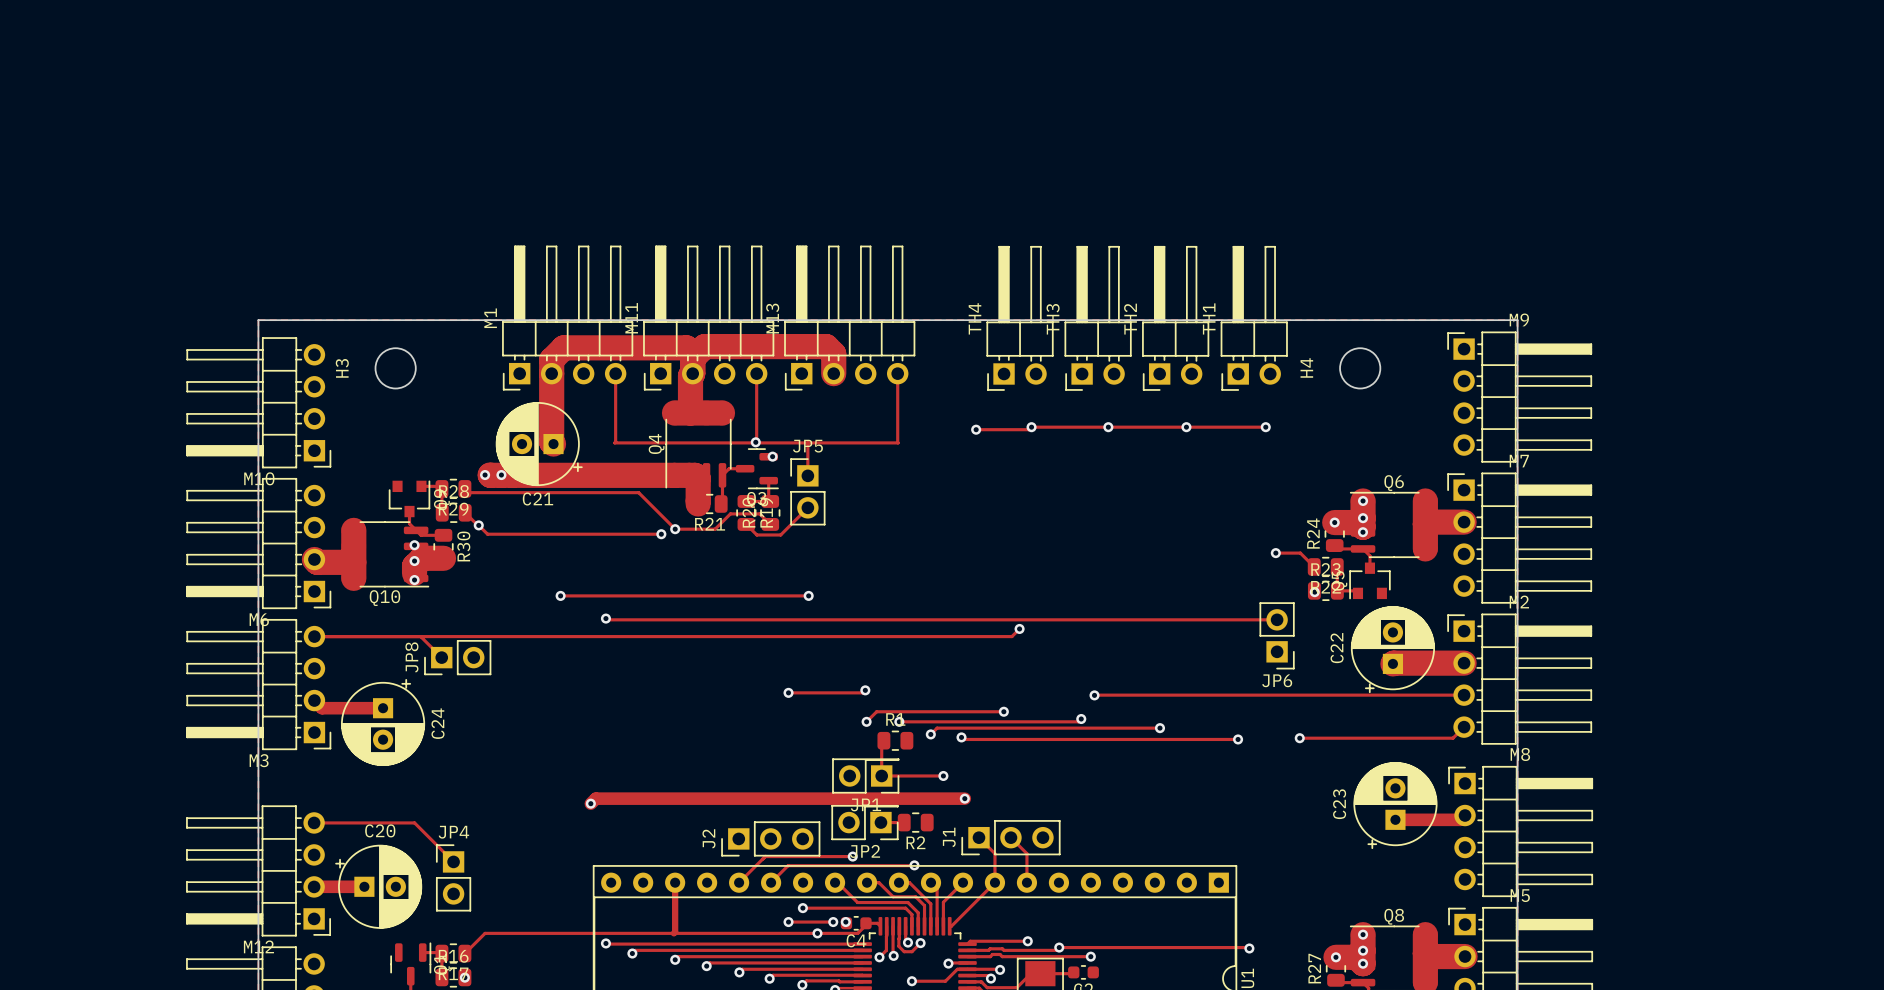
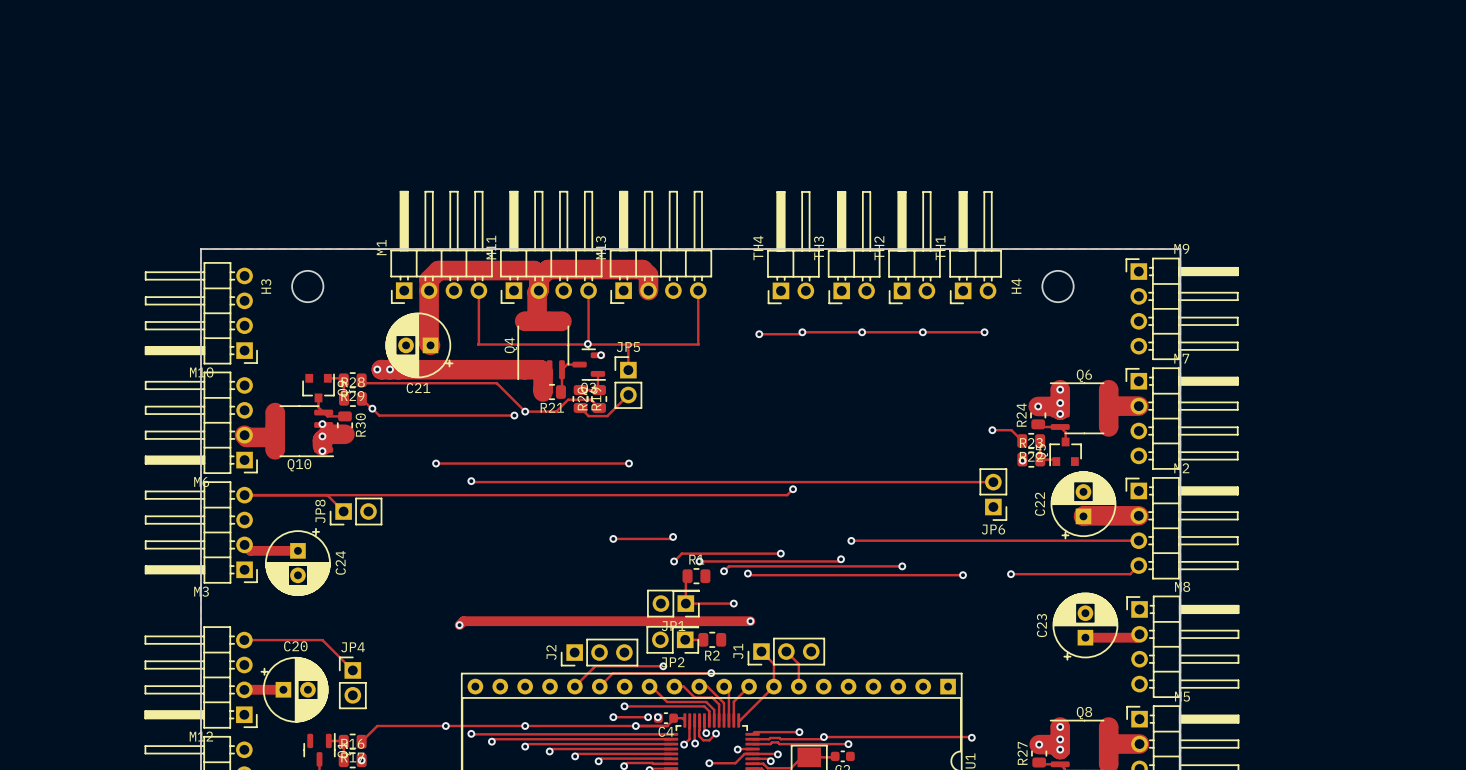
track: (675, 882) (673, 933) -> none
via: none -> (445, 726)
via: none -> (525, 726)

